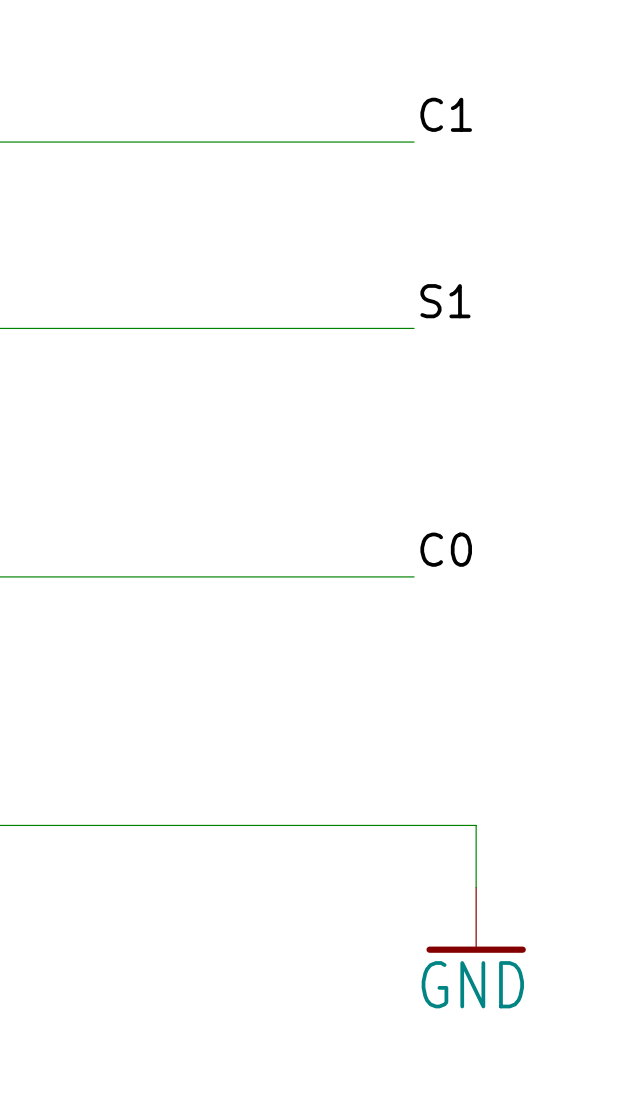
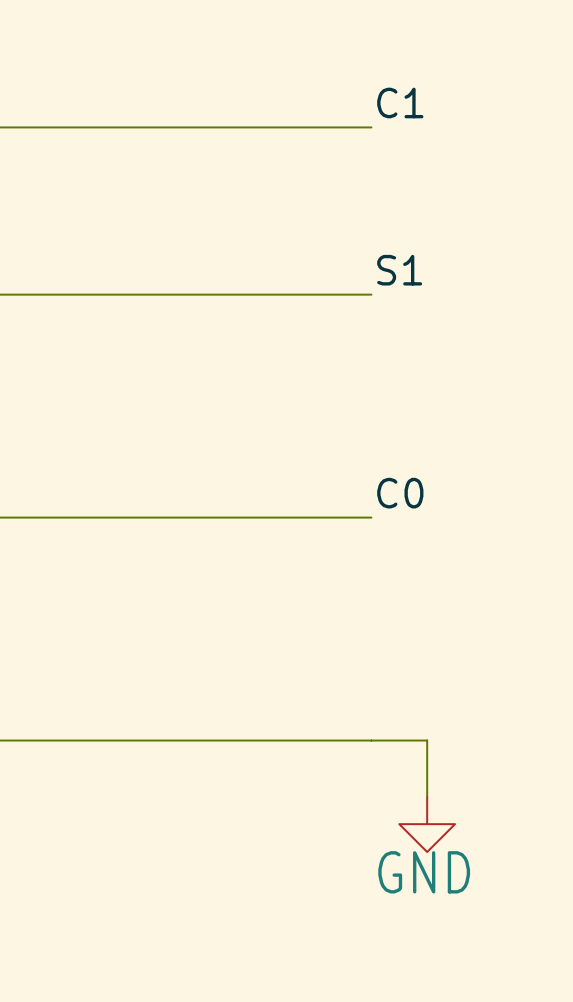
power symbol shape: [426, 887, 526, 953] -> [399, 796, 456, 853]

